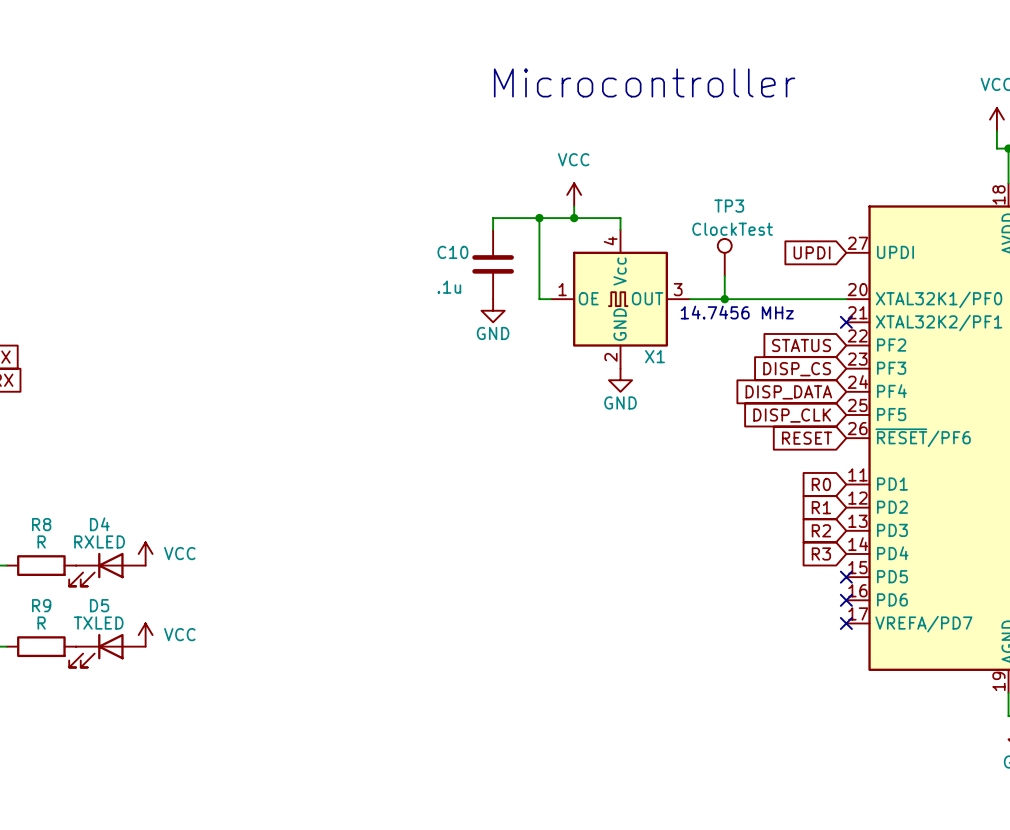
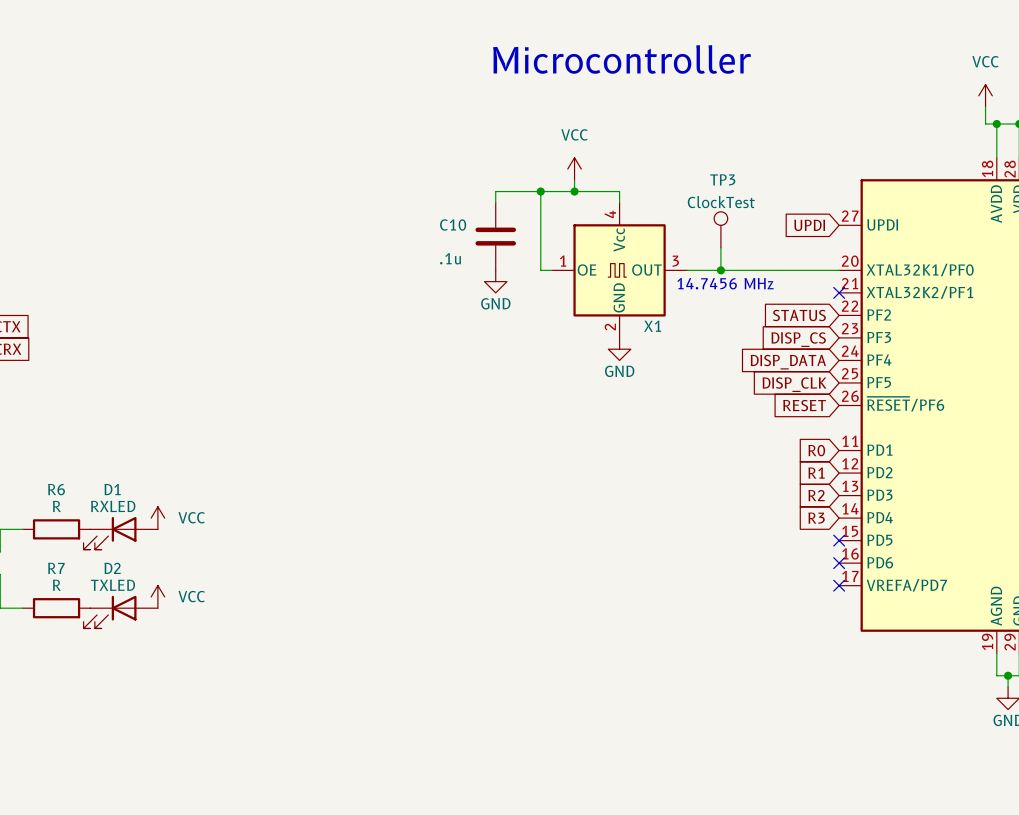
R8 name: R8 (41, 524) -> R6 (56, 489)
D4 name: D4 (99, 524) -> D1 (112, 489)
R9 name: R9 (41, 605) -> R7 (56, 568)
D5 name: D5 (99, 605) -> D2 (112, 568)

